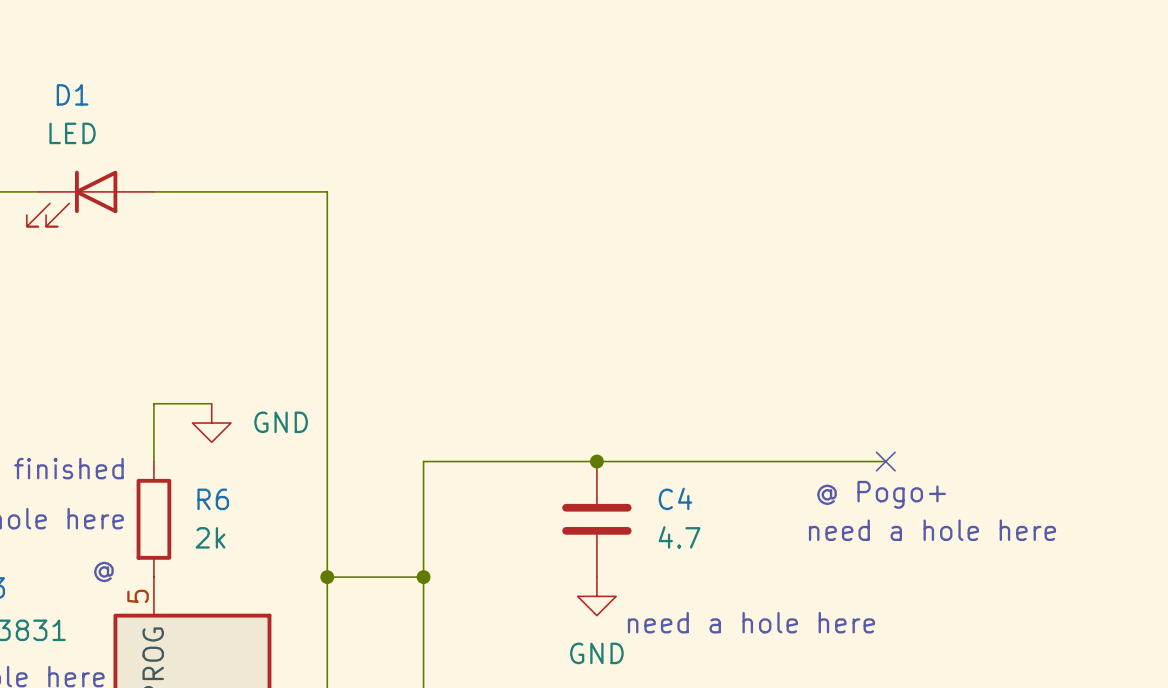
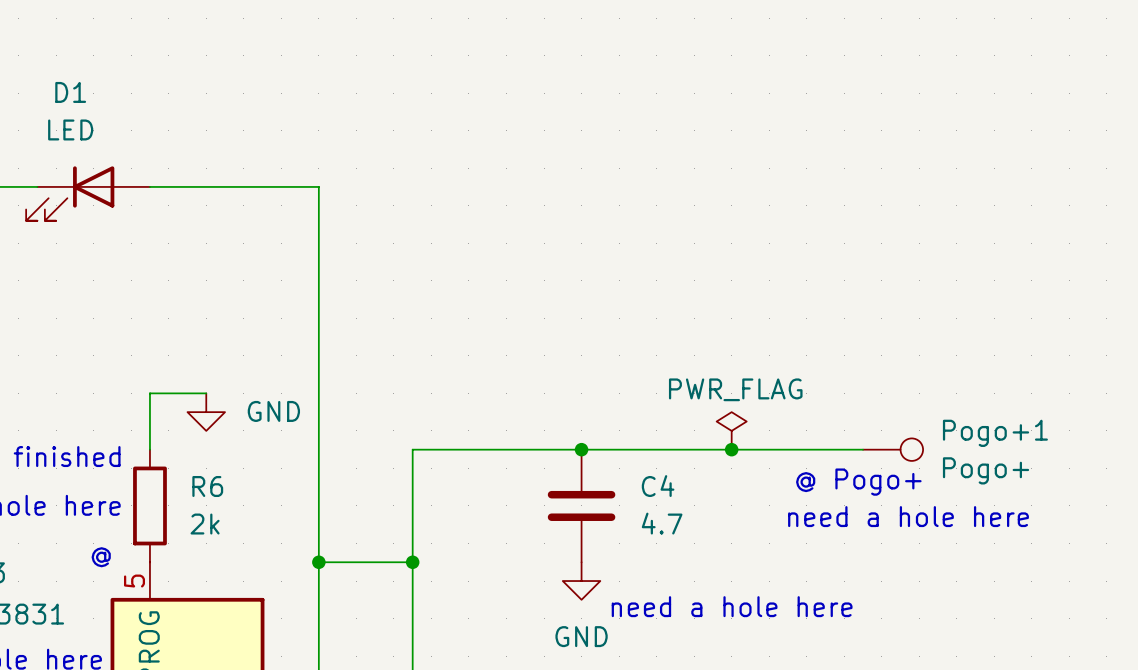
power symbol: none -> PWR_FLAG (731, 430)
junction: none -> (731, 449)
no-connect mark: (885, 461) -> none
Pogo+1: none -> Pogo+ (893, 449)

